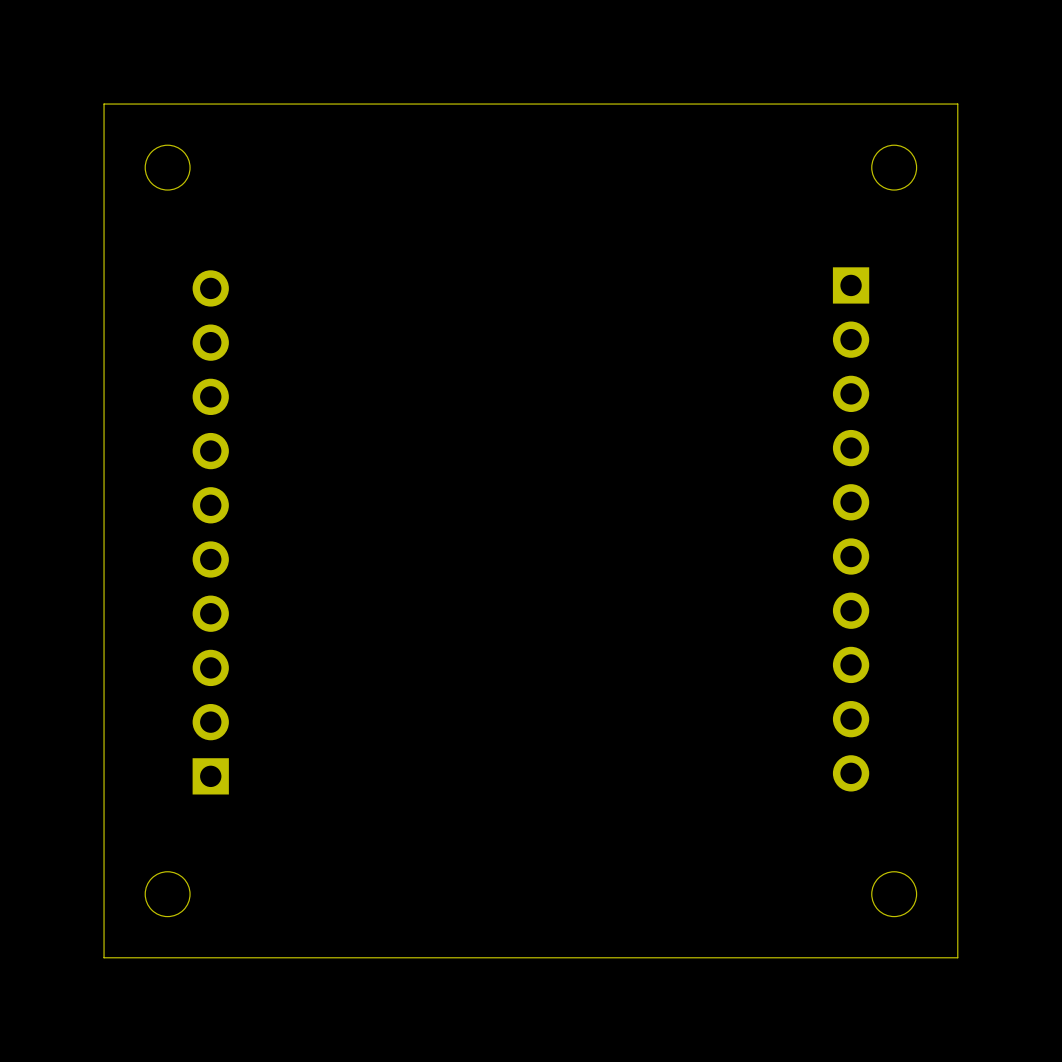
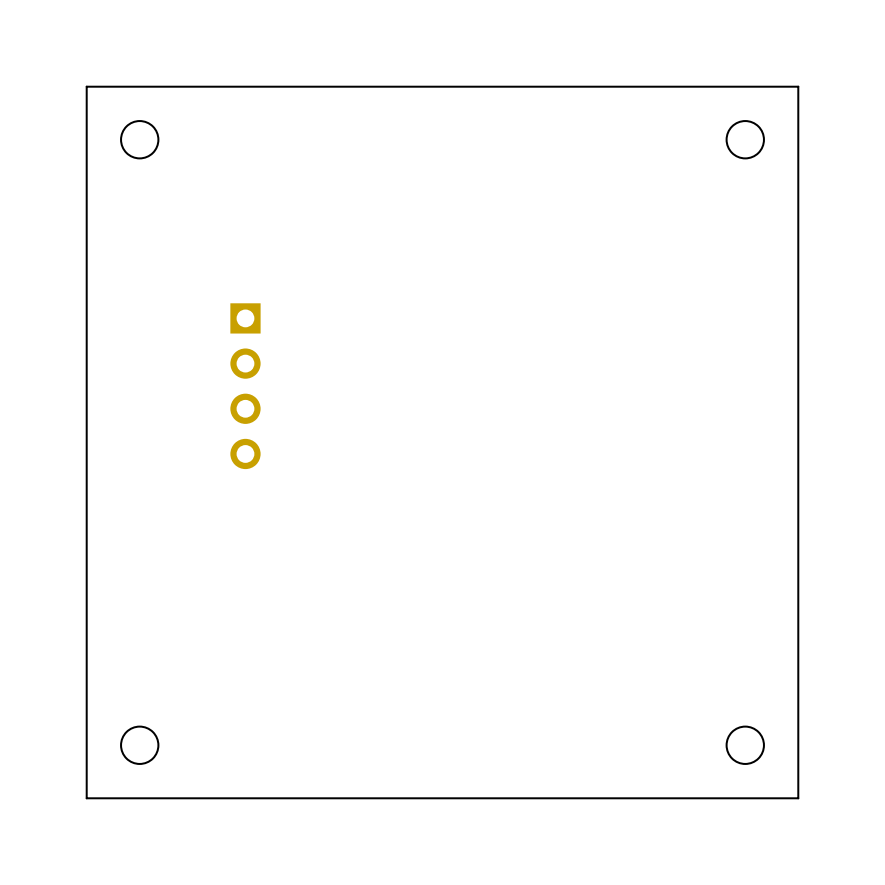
part: none -> (245, 386)
part: (851, 529) -> none
part: (210, 532) -> none

